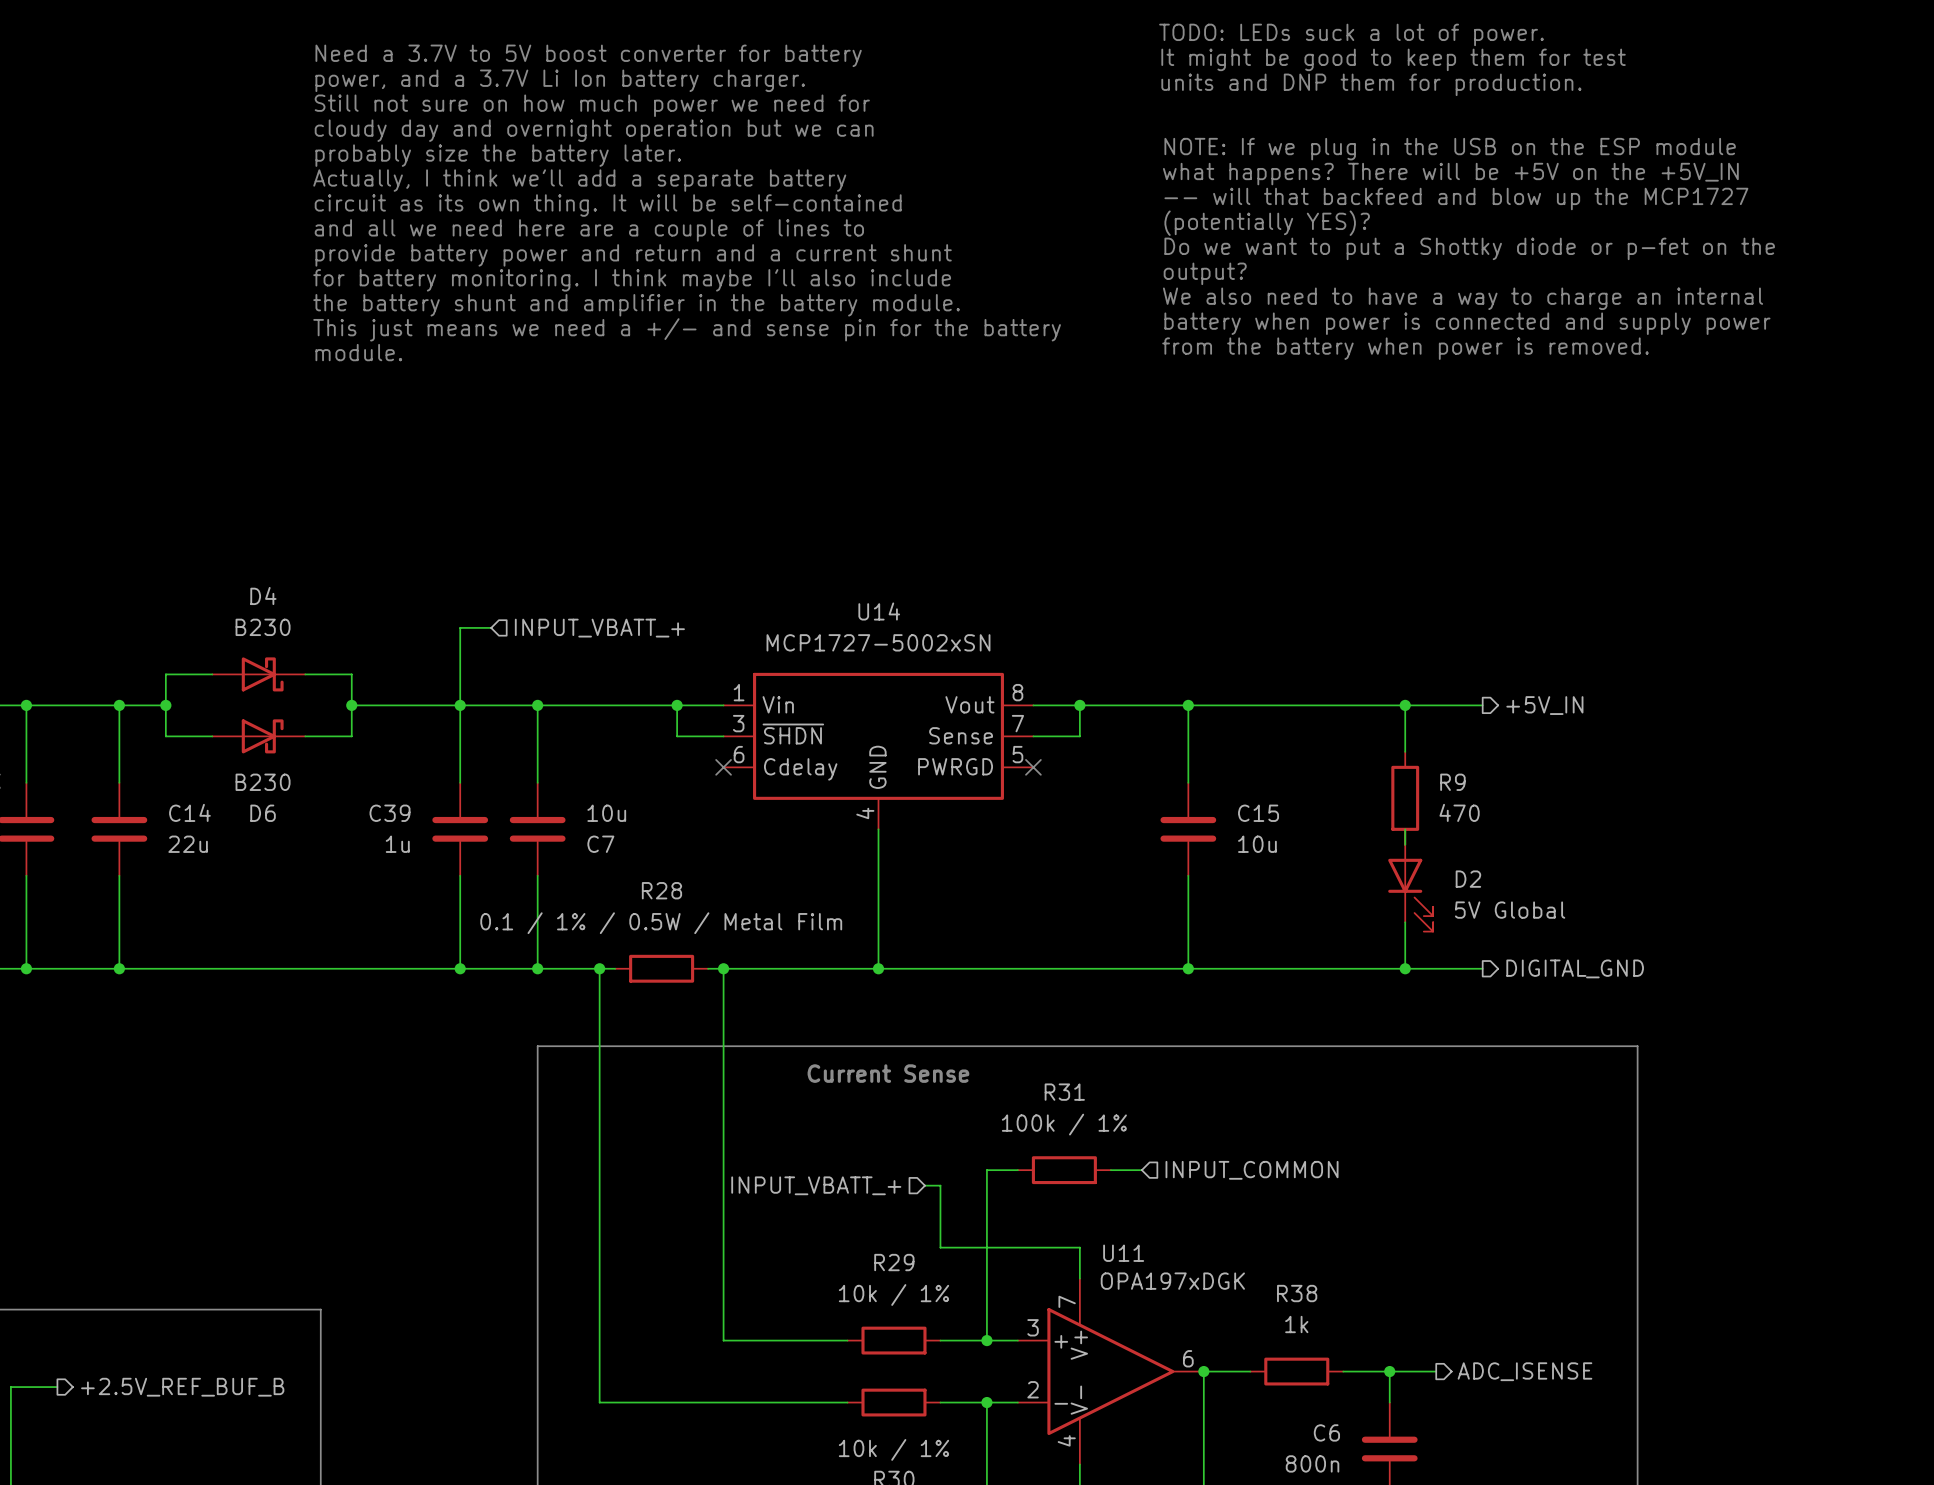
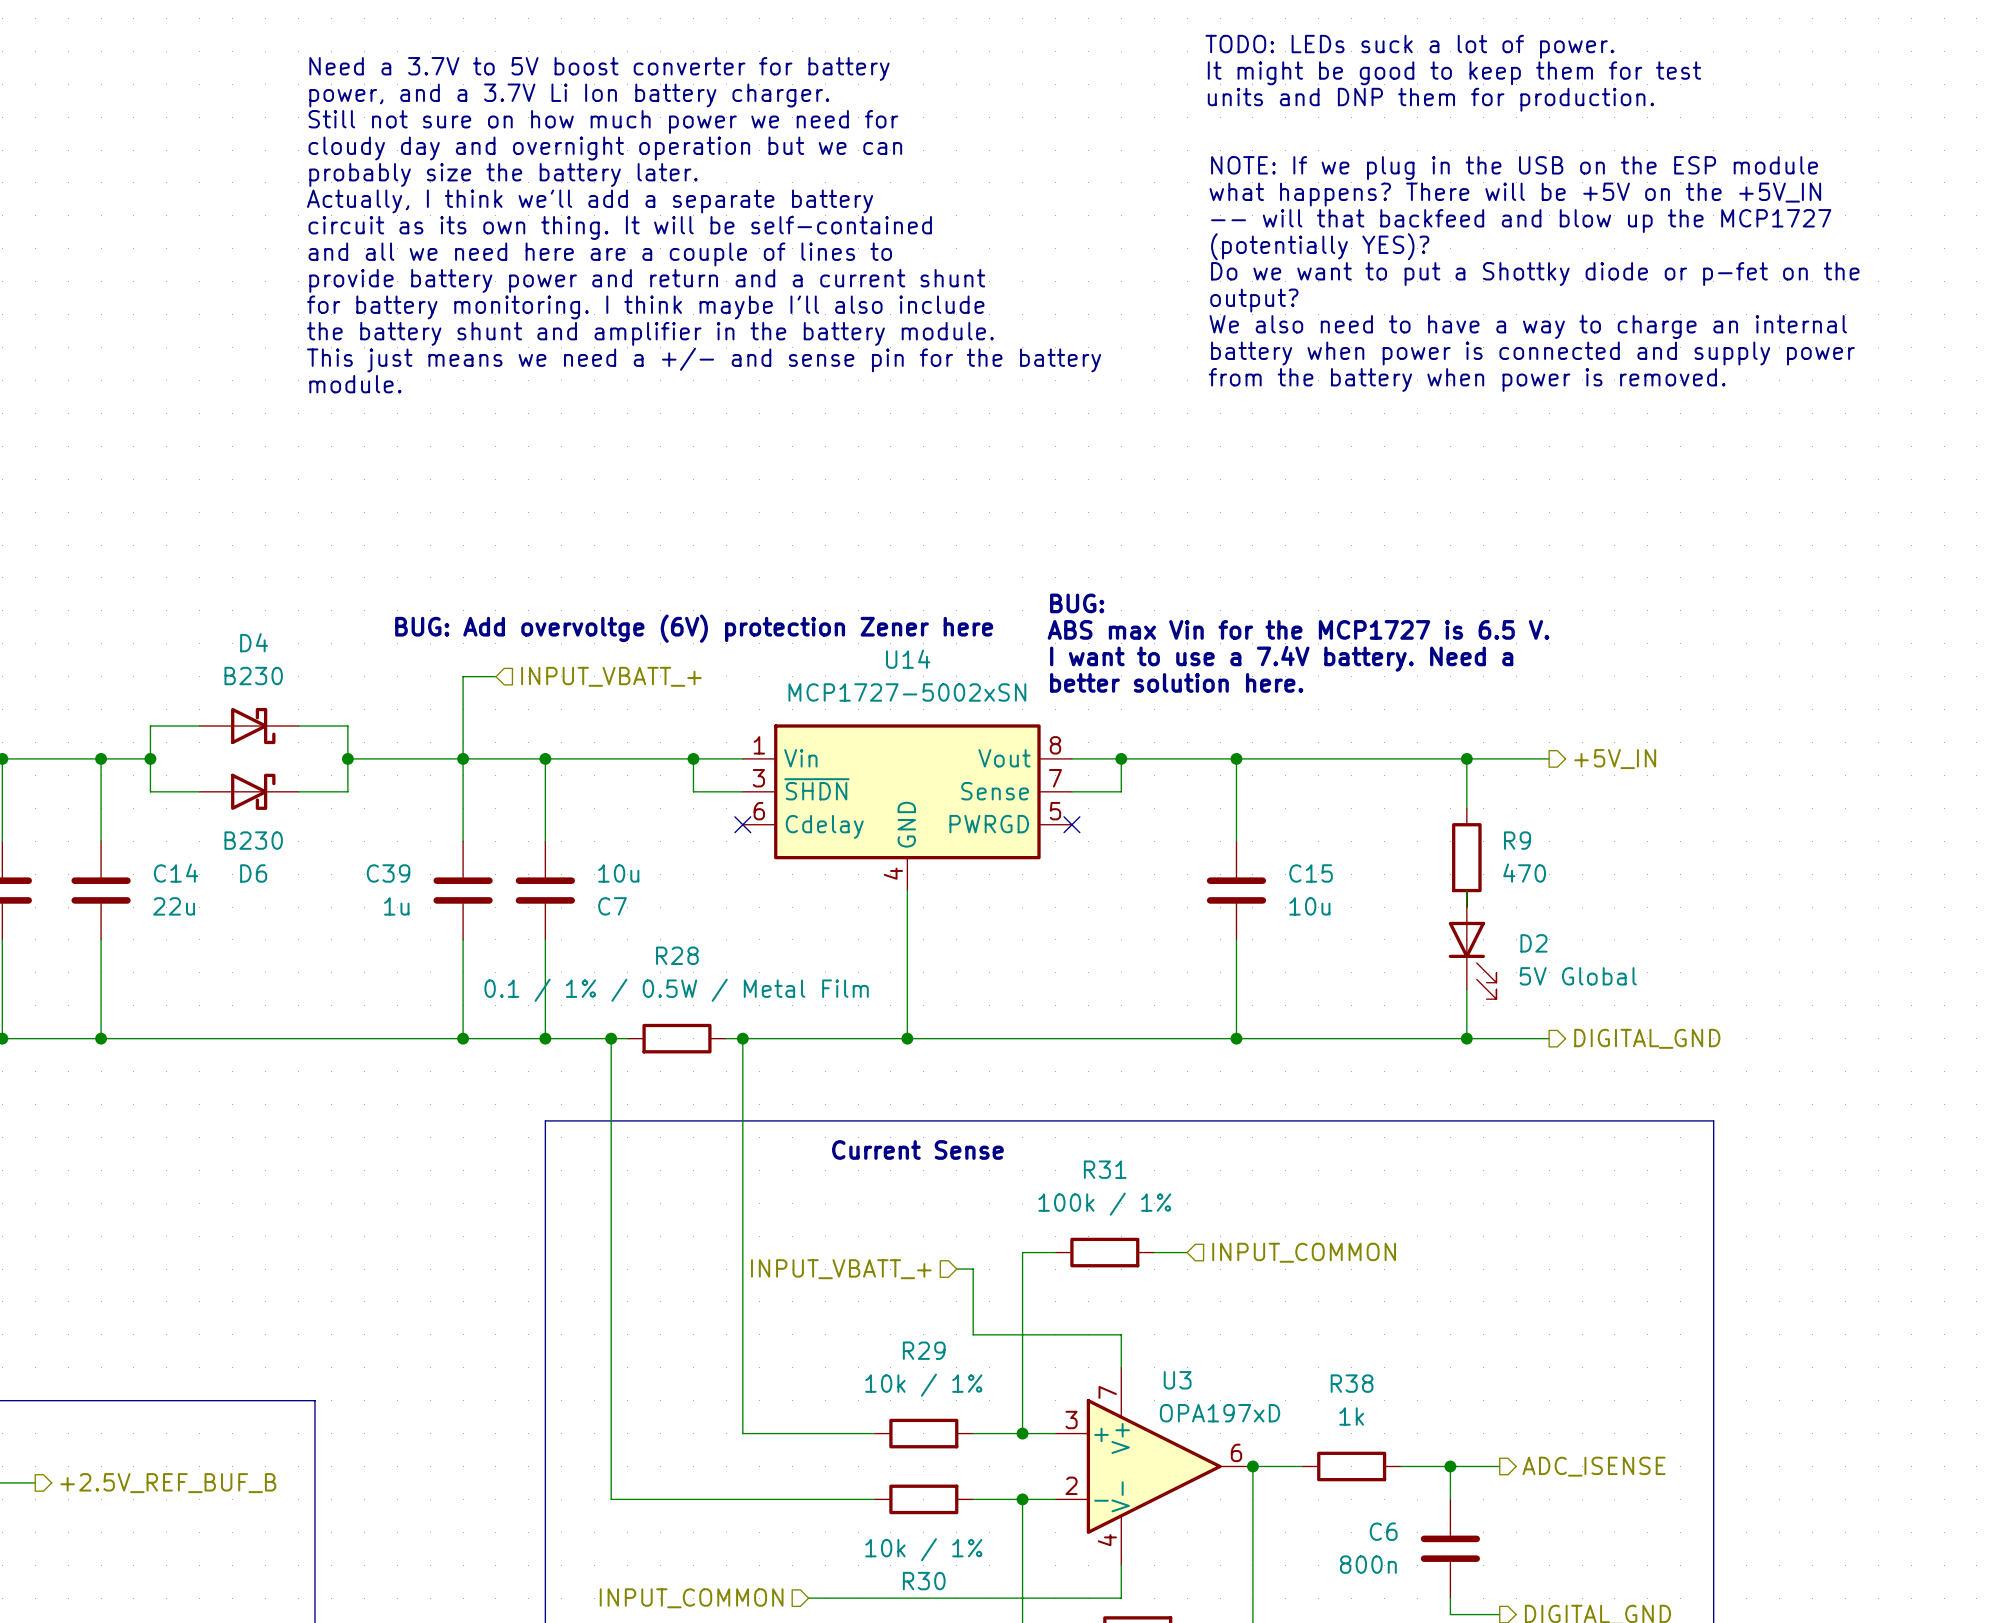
text: none -> BUG: (1077, 603)
text: none -> BUG: Add overvoltge (6V) protection Zener here (694, 628)
text: none -> ABS max Vin for the MCP1727 is 6.5 V. (1298, 629)
text: none -> I want to use a 7.4V battery. Need a (1281, 658)
text: none -> better solution here. (1176, 682)
U11 name: U11 (1123, 1253) -> U3 (1177, 1380)
U11 value: OPA197xDGK (1172, 1281) -> OPA197xD (1220, 1413)

